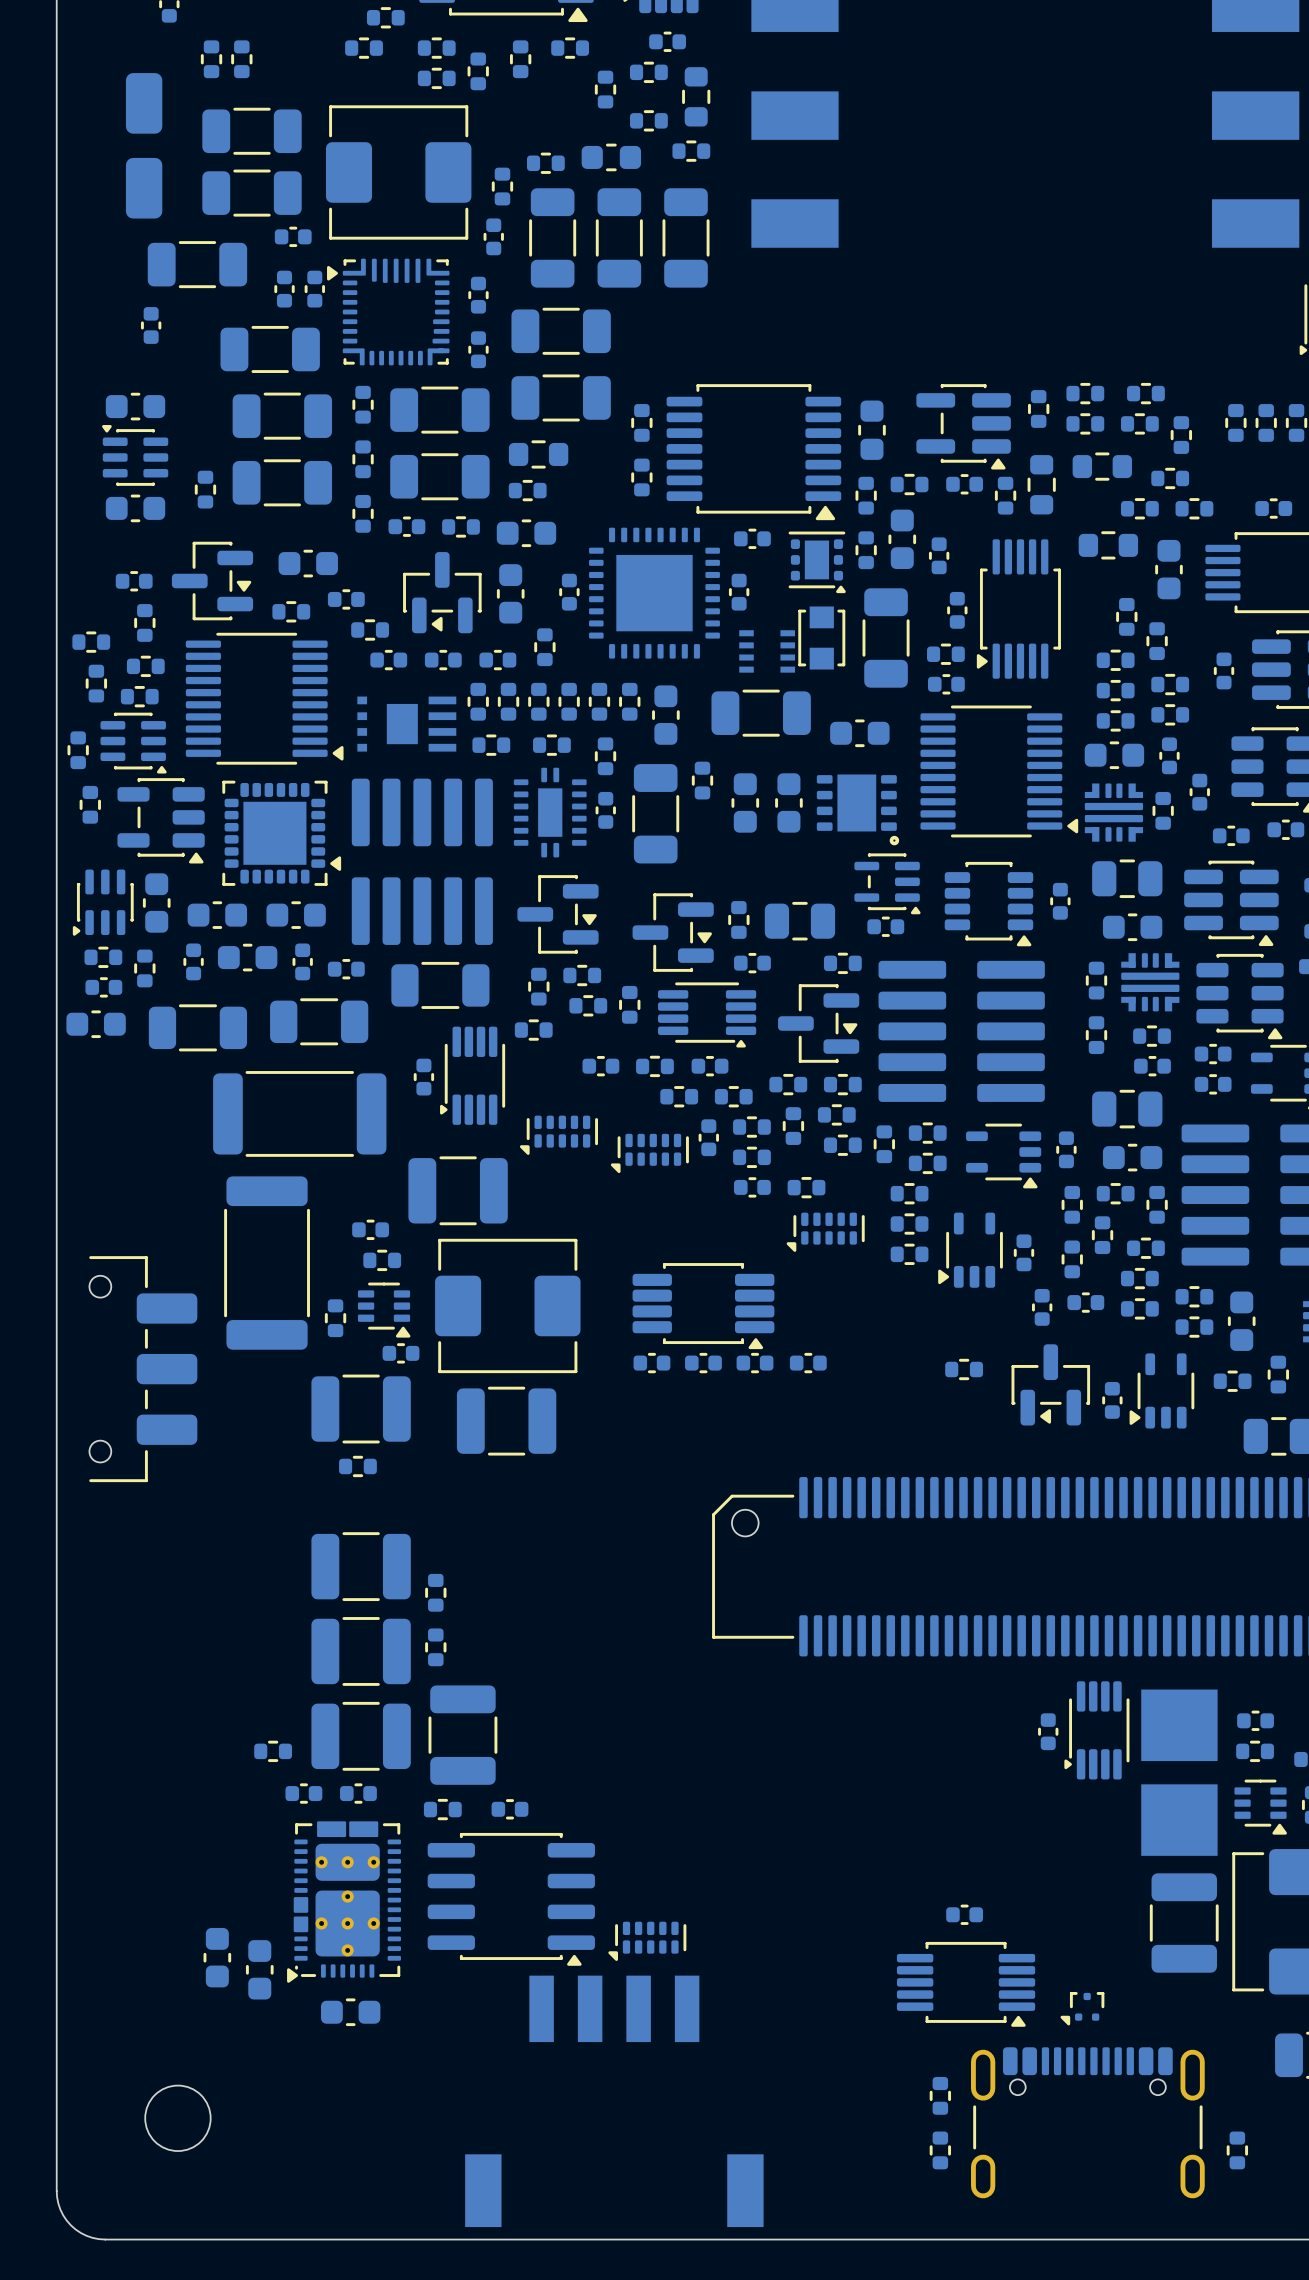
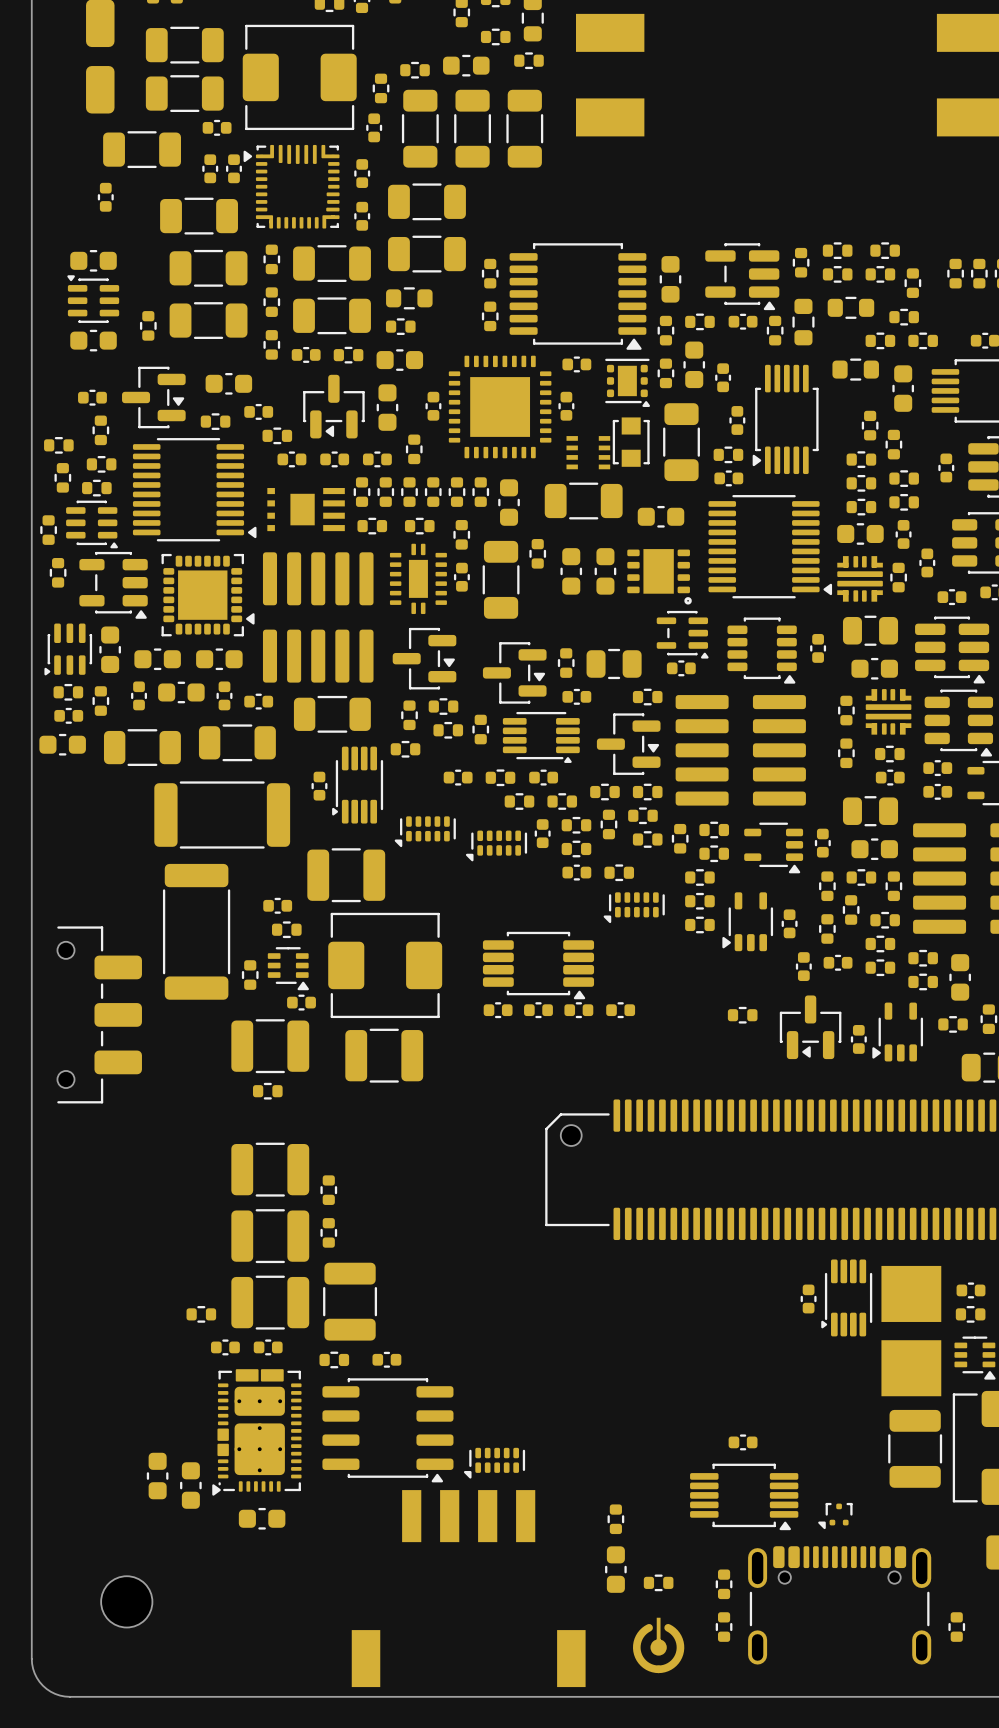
part: none -> (615, 1519)
part: none -> (615, 1569)
part: none -> (658, 1582)
part: none -> (658, 1645)

